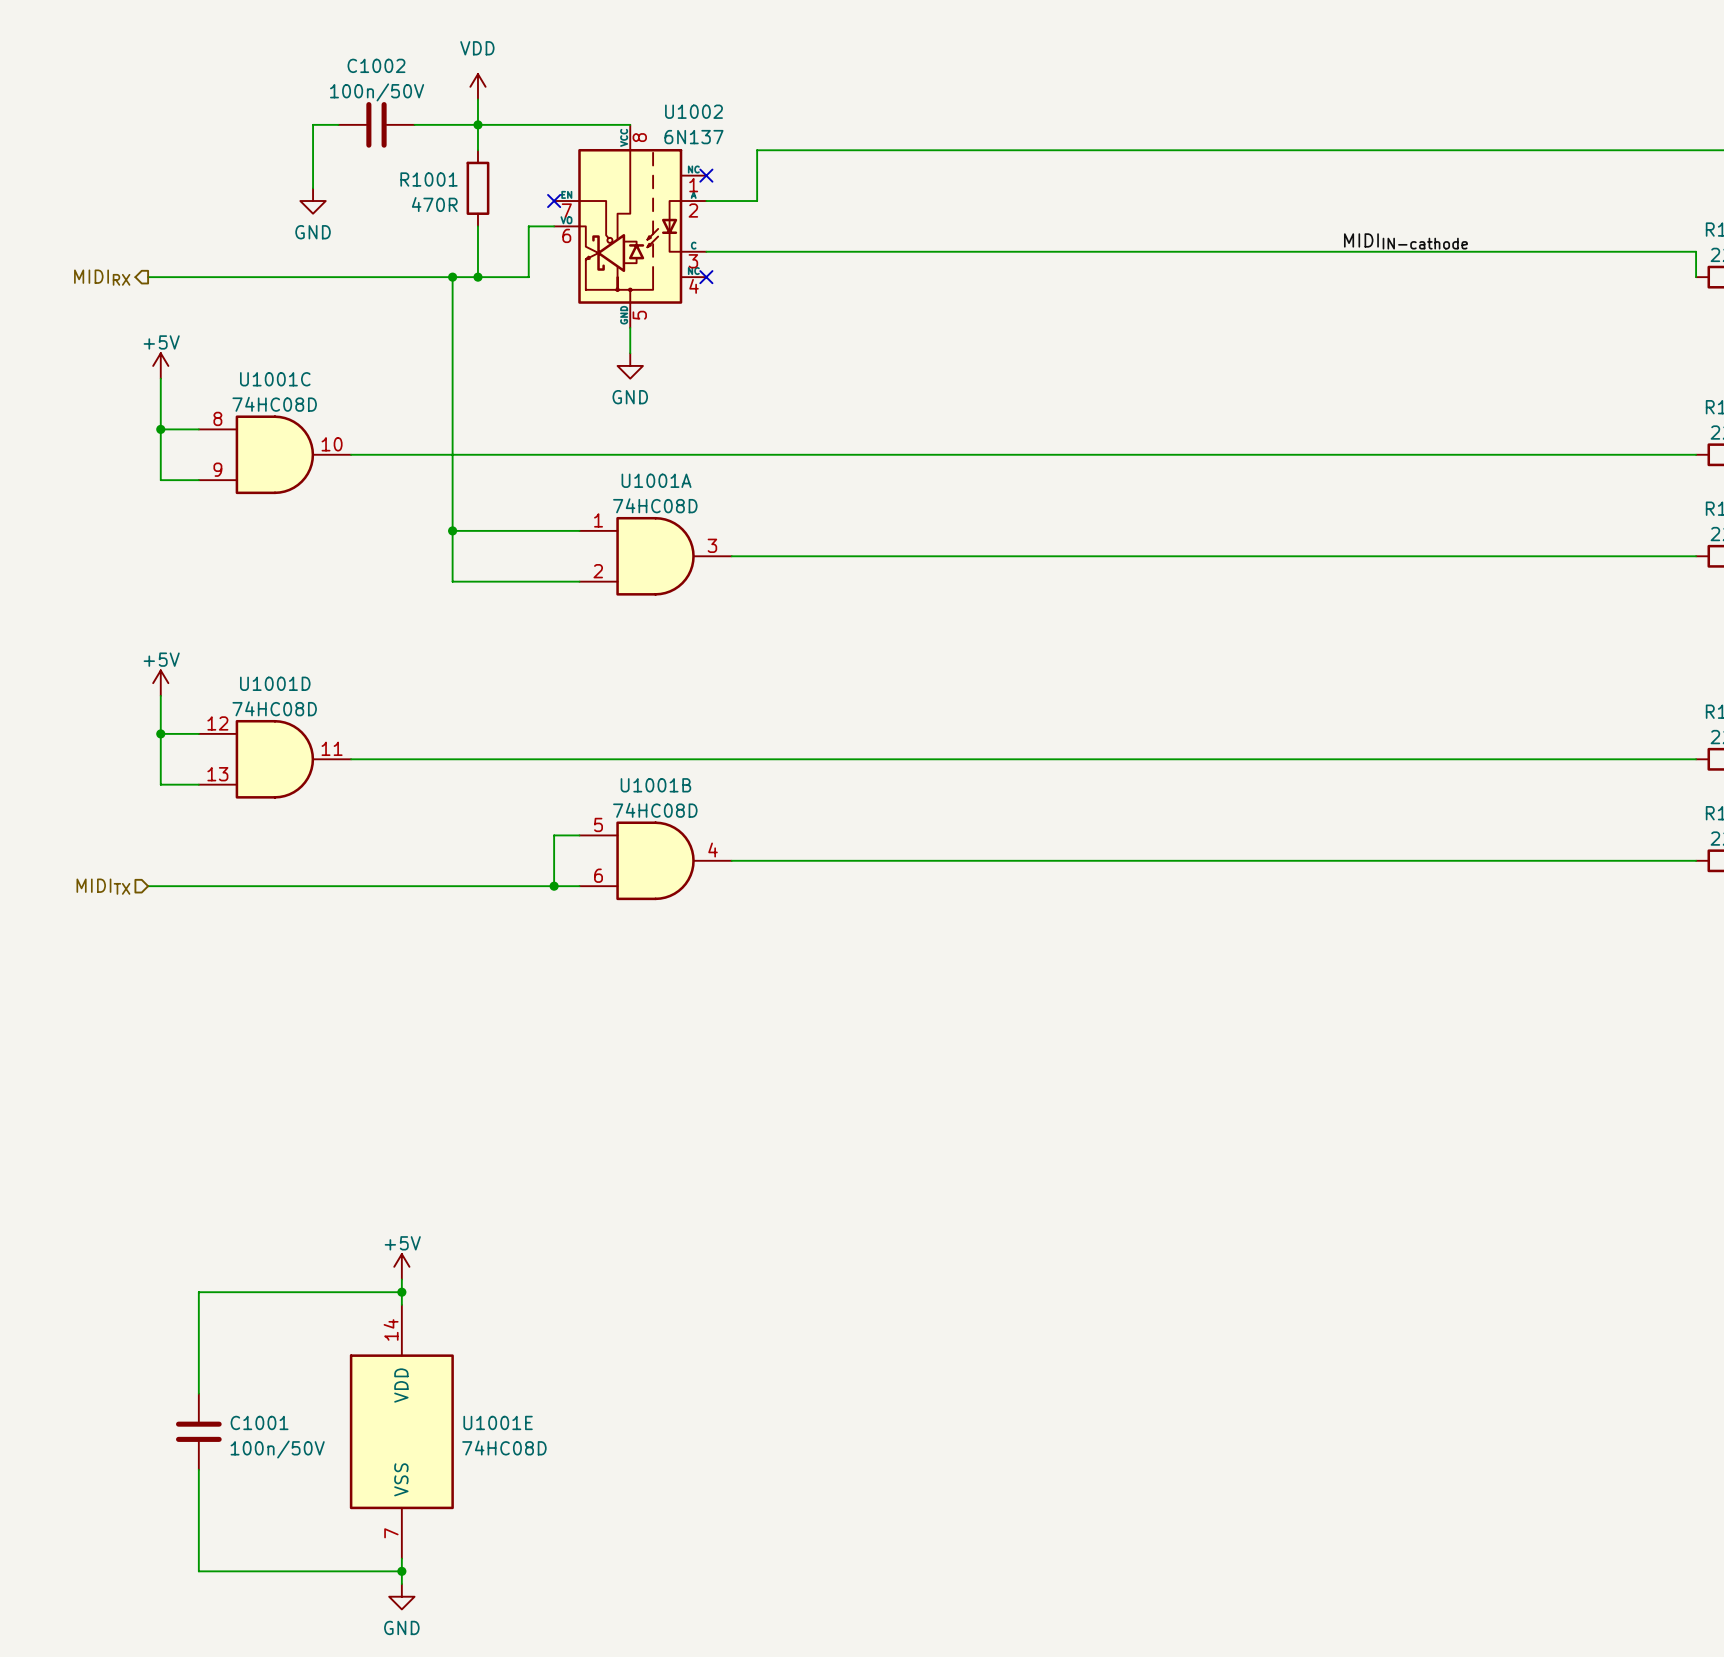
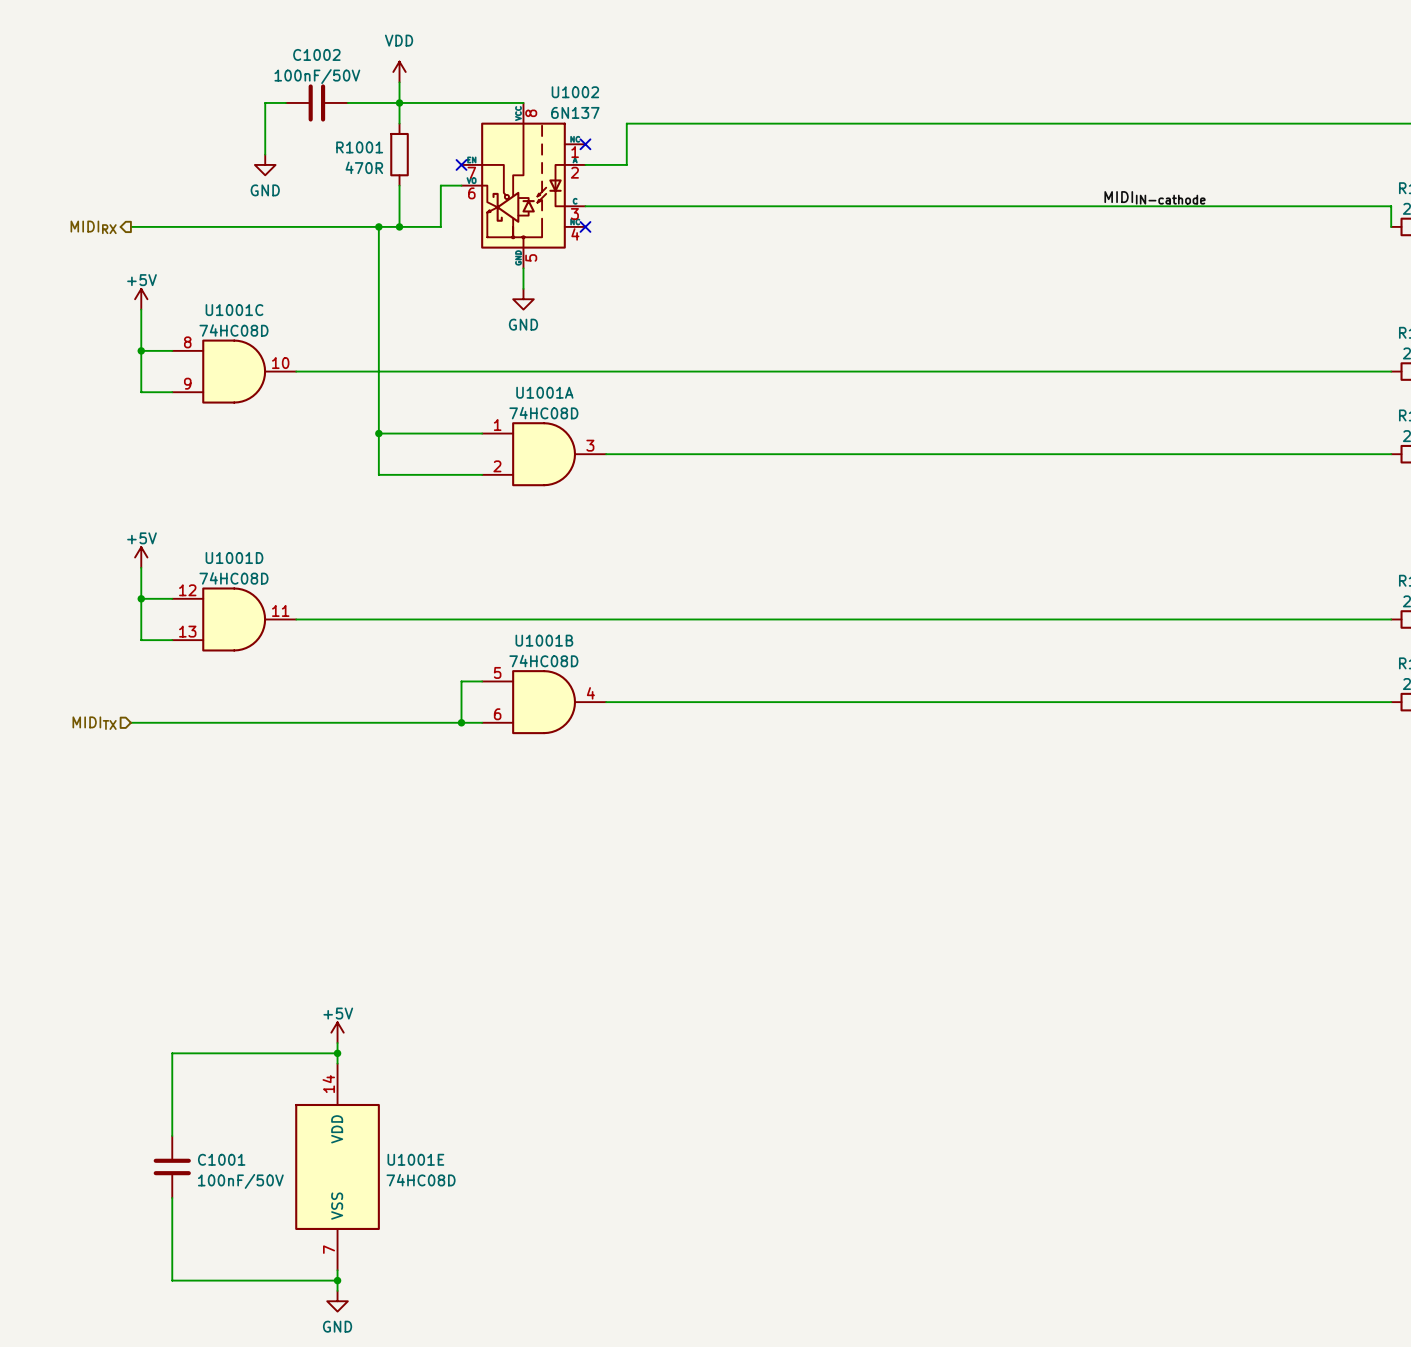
C1002 value: 100n/50V (377, 92) -> 100nF/50V (317, 76)
C1001 value: 100n/50V (277, 1449) -> 100nF/50V (240, 1181)

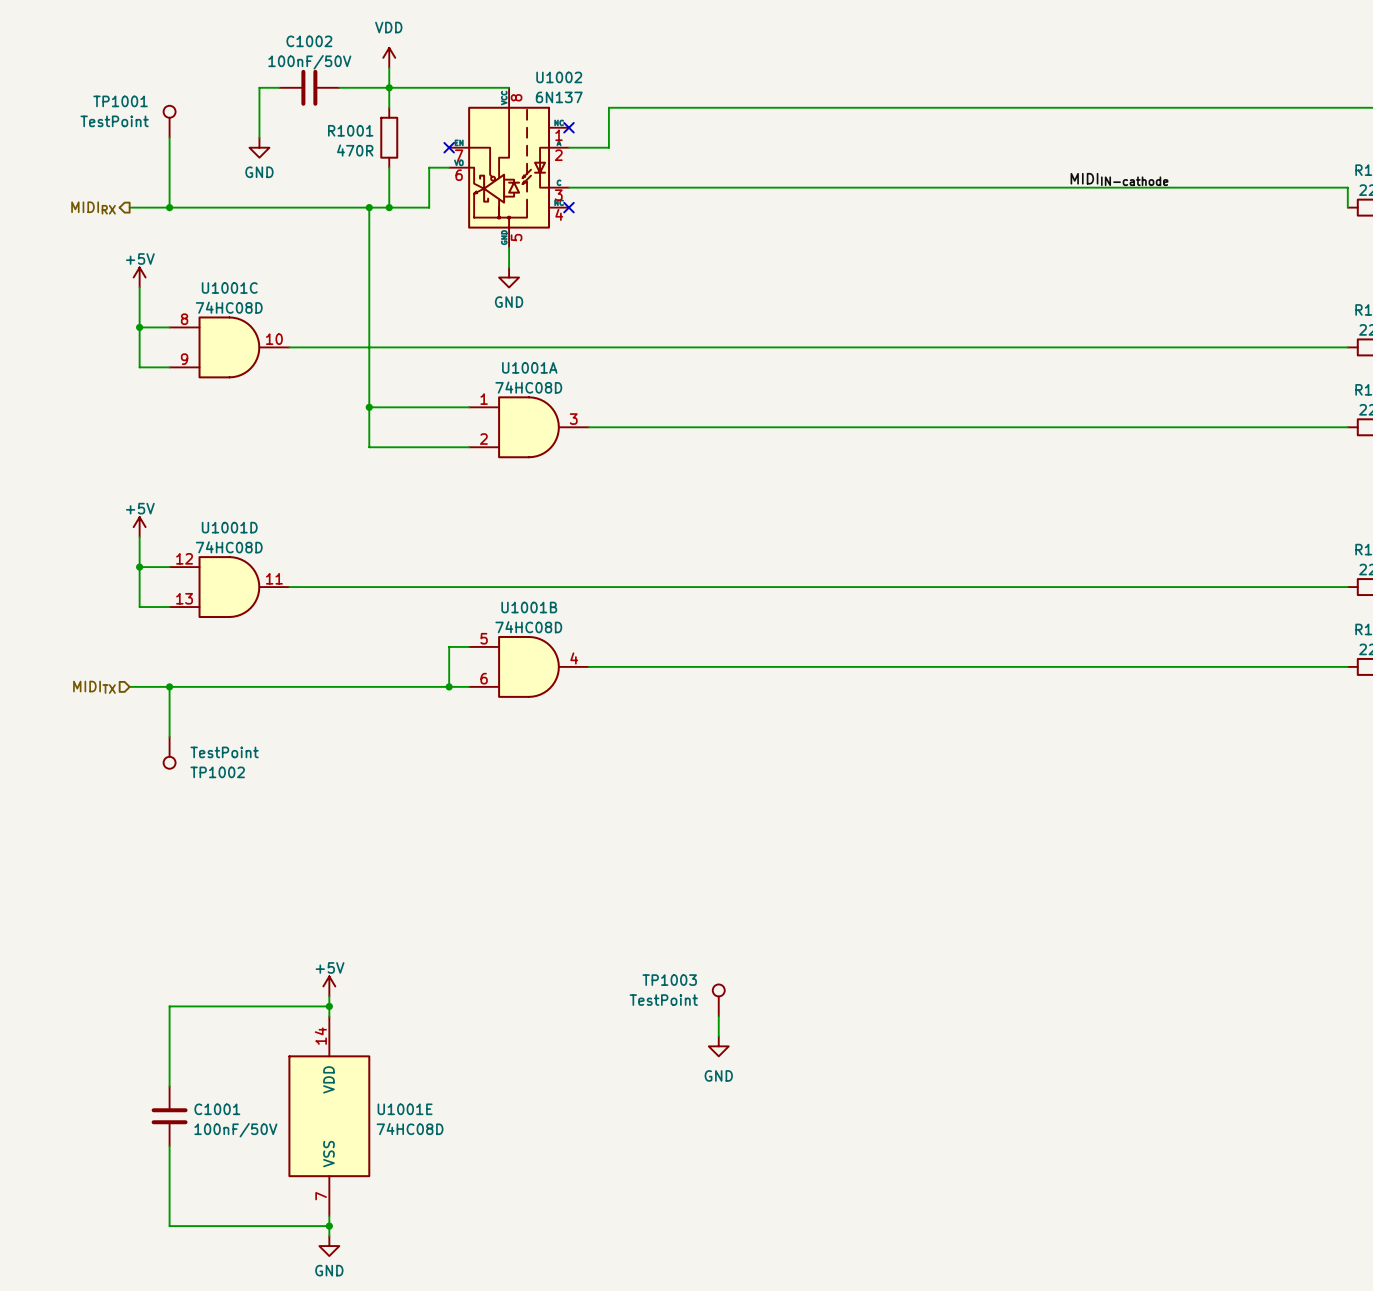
TP1001: none -> TestPoint (169, 121)
wire: none -> (169, 137) (169, 207)
junction: none -> (169, 207)
wire: none -> (169, 686) (169, 736)
junction: none -> (169, 686)
TP1002: none -> TestPoint (169, 752)
TP1003: none -> TestPoint (718, 1000)
wire: none -> (718, 1016) (718, 1036)
power symbol: none -> GND (718, 1046)

